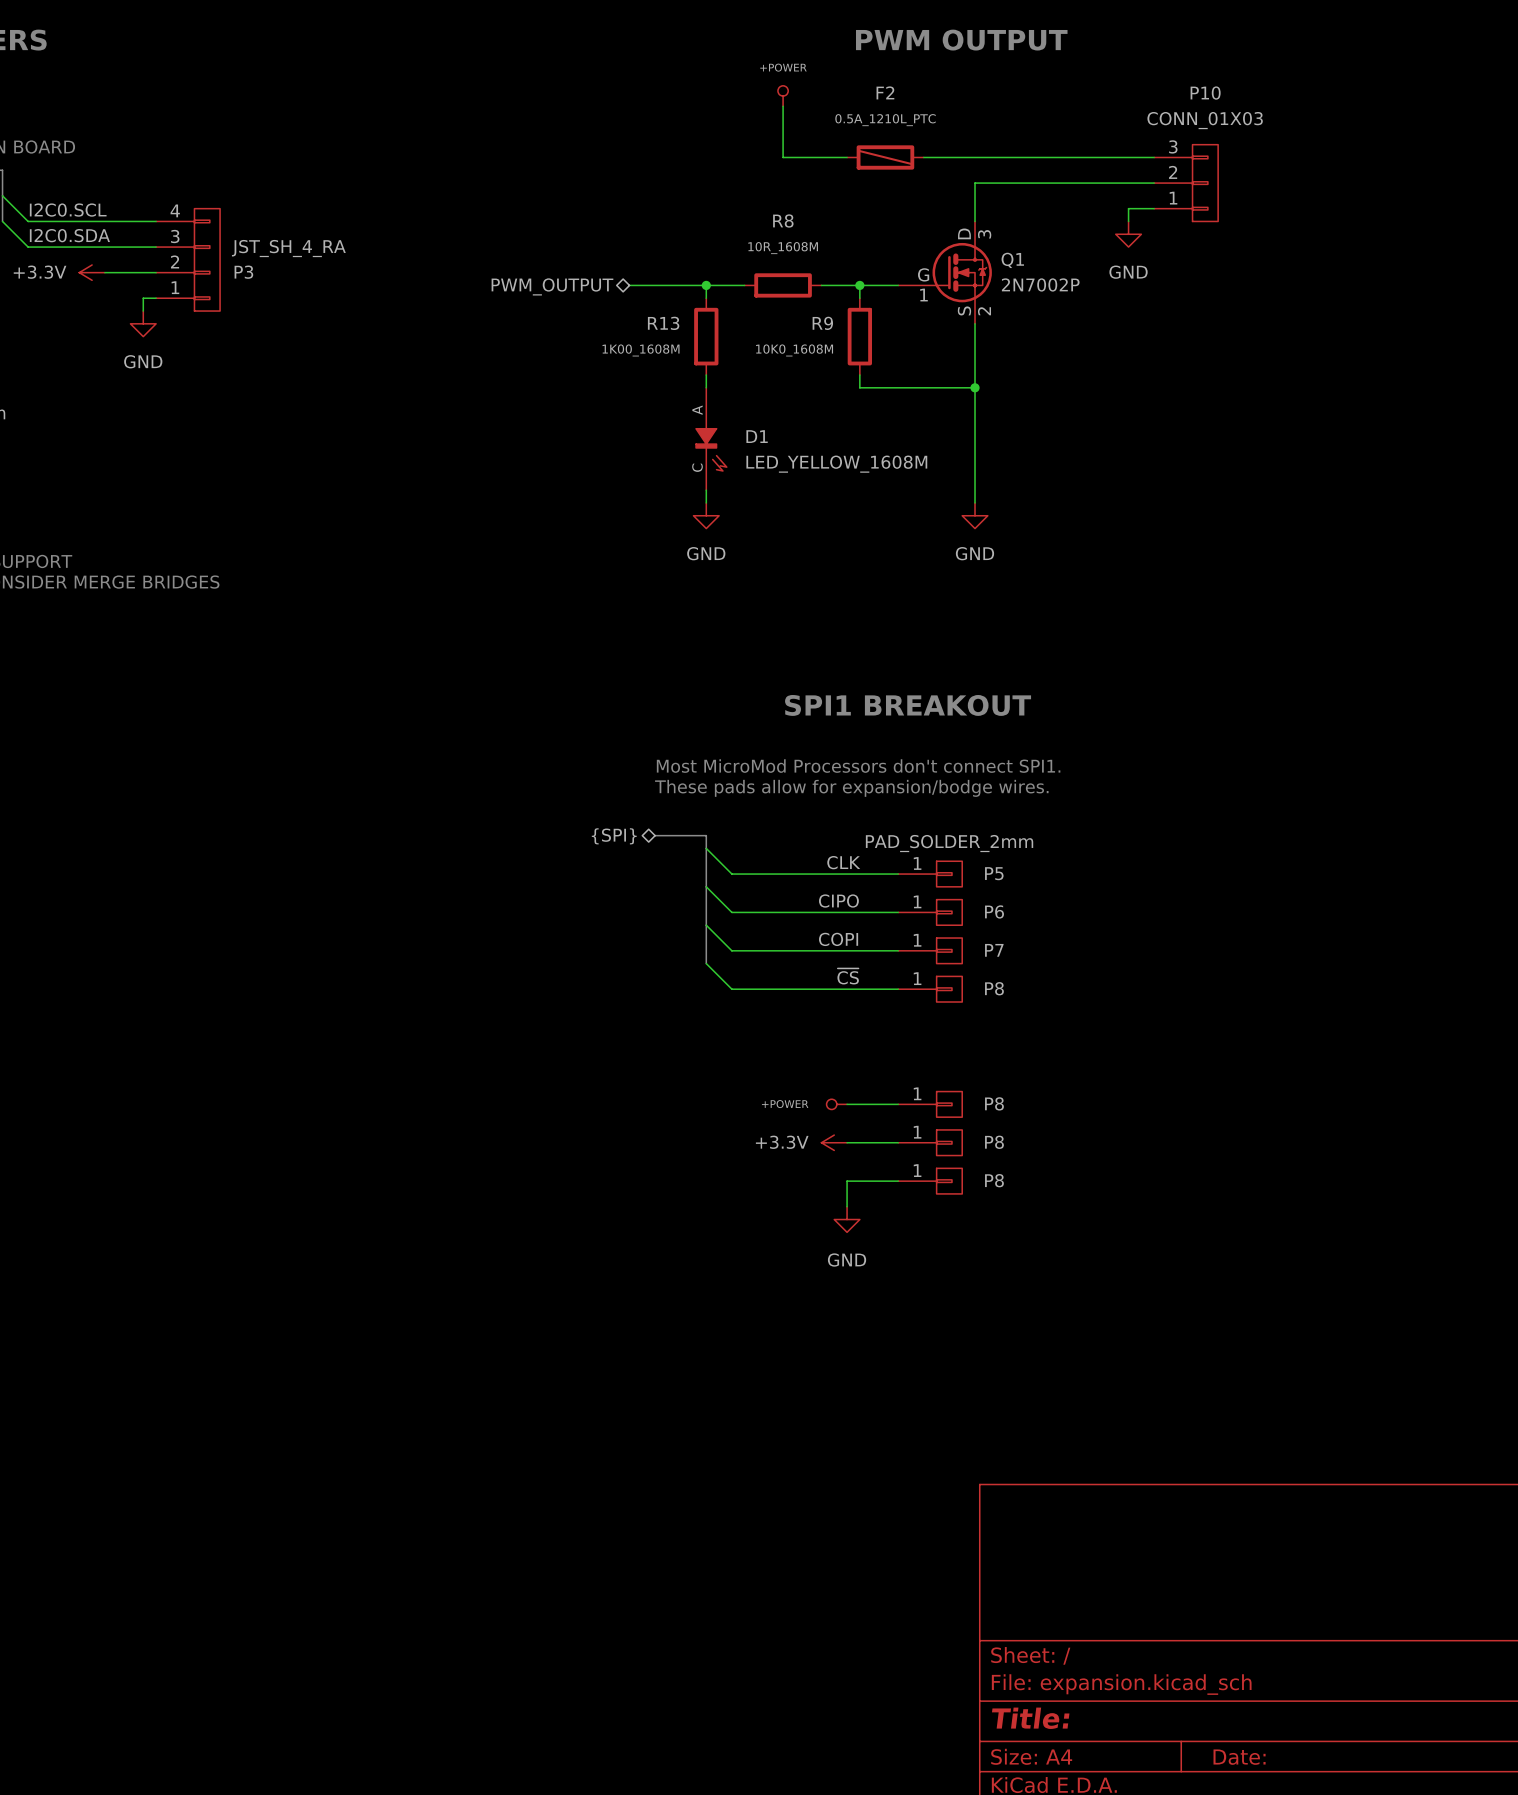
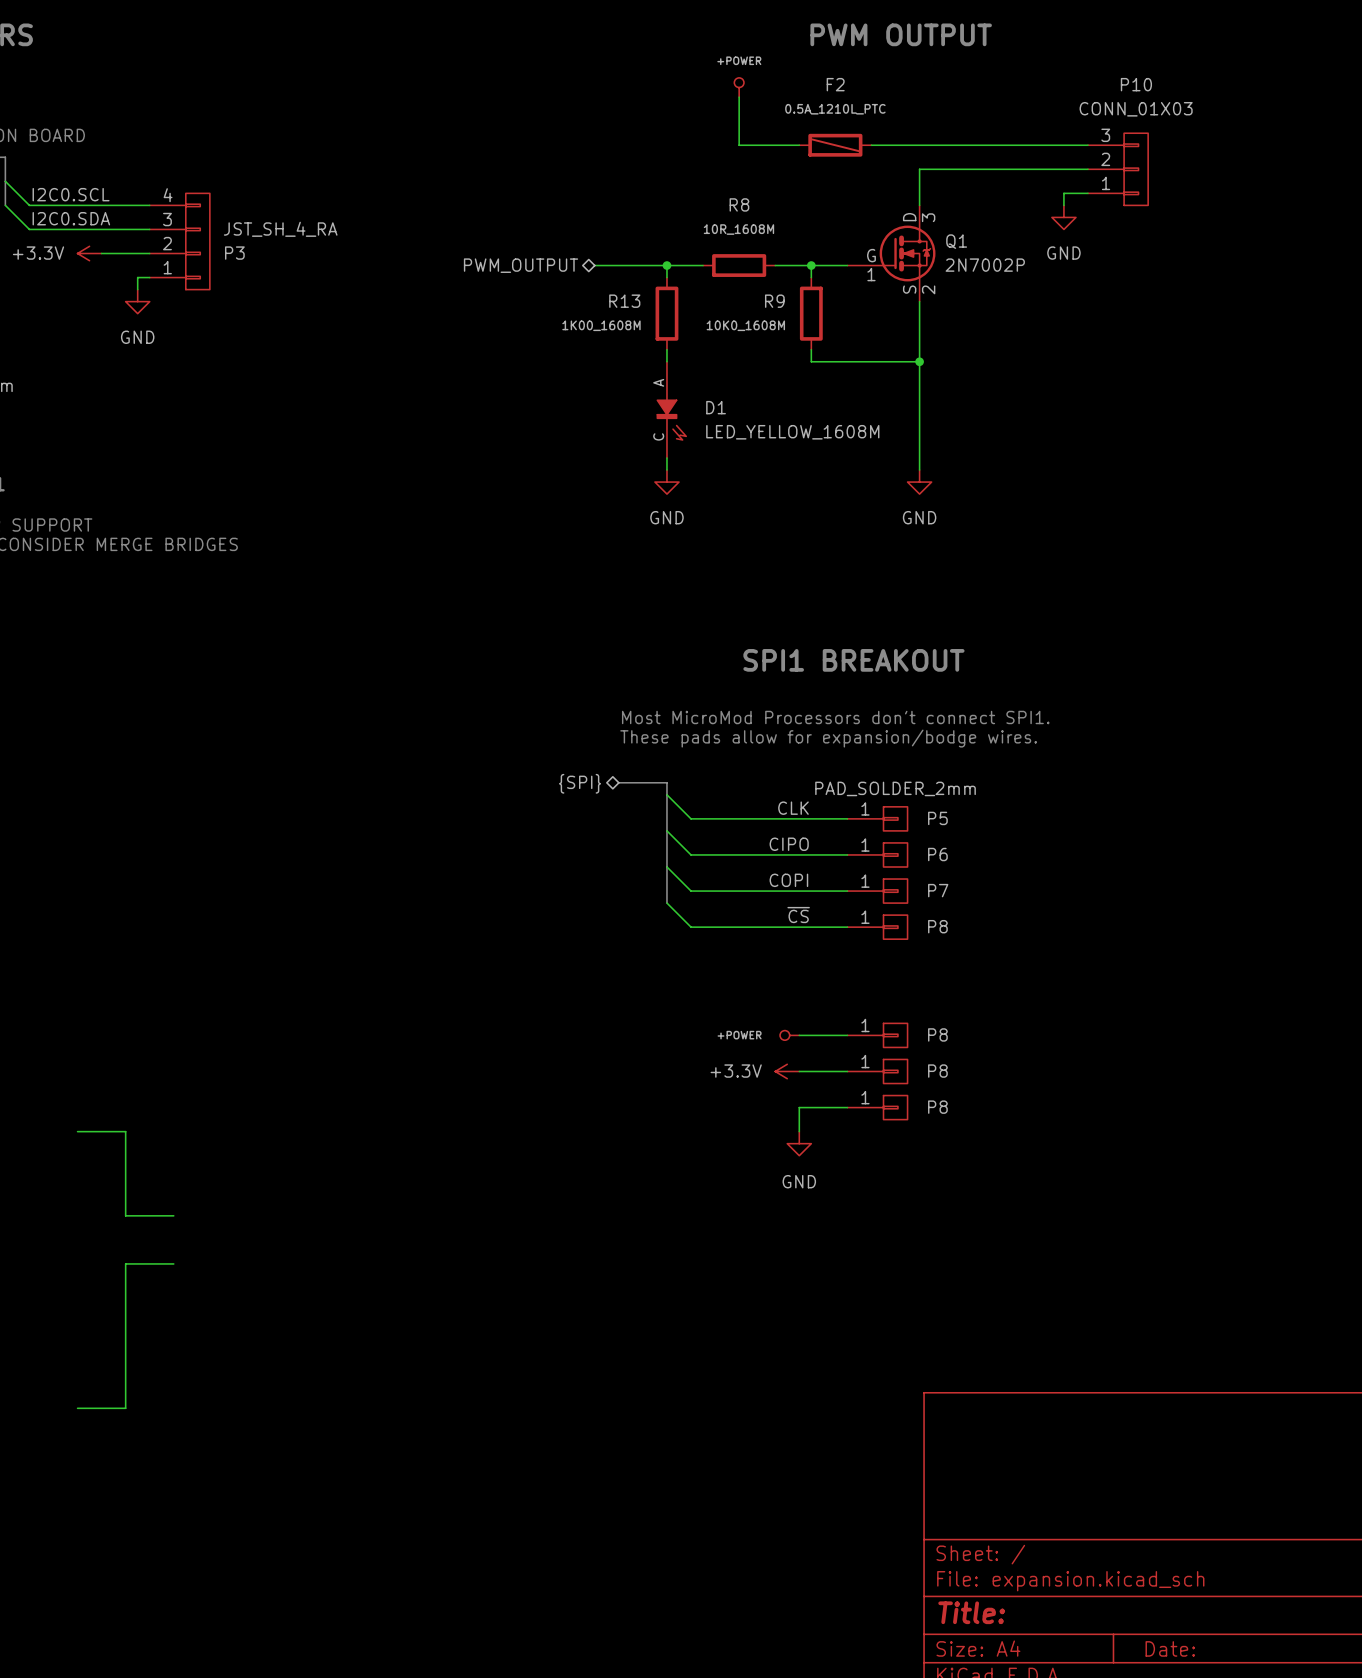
wire: none -> (77, 1131) (125, 1131) (125, 1215) (173, 1215)
wire: none -> (173, 1263) (125, 1263) (125, 1408) (77, 1408)

